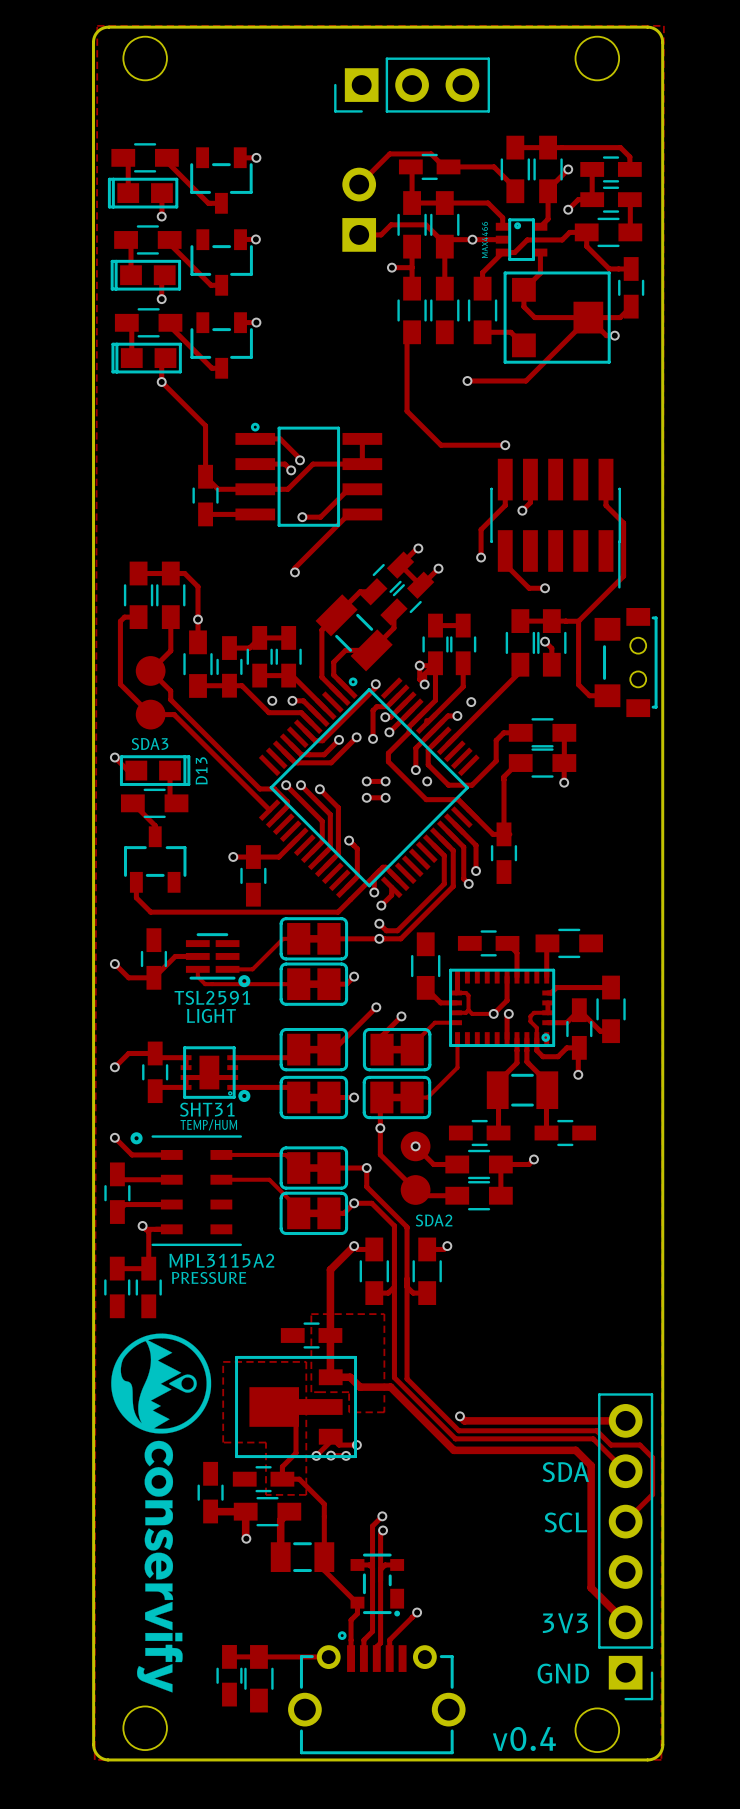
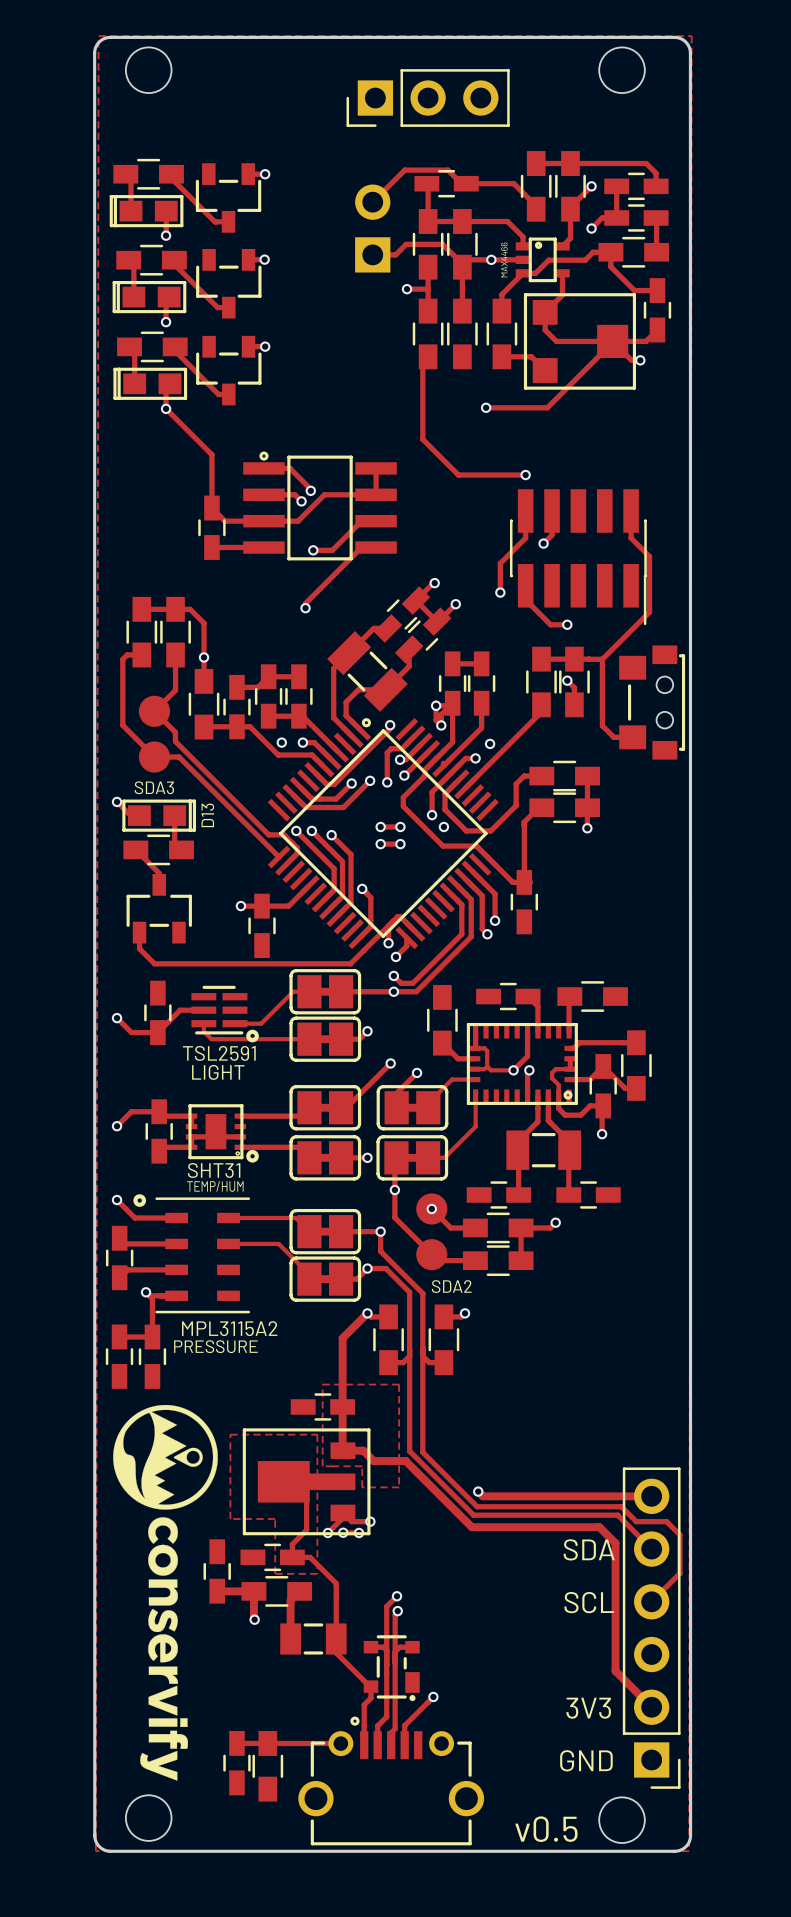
text: v0.4 (524, 1738) -> v0.5 (546, 1829)

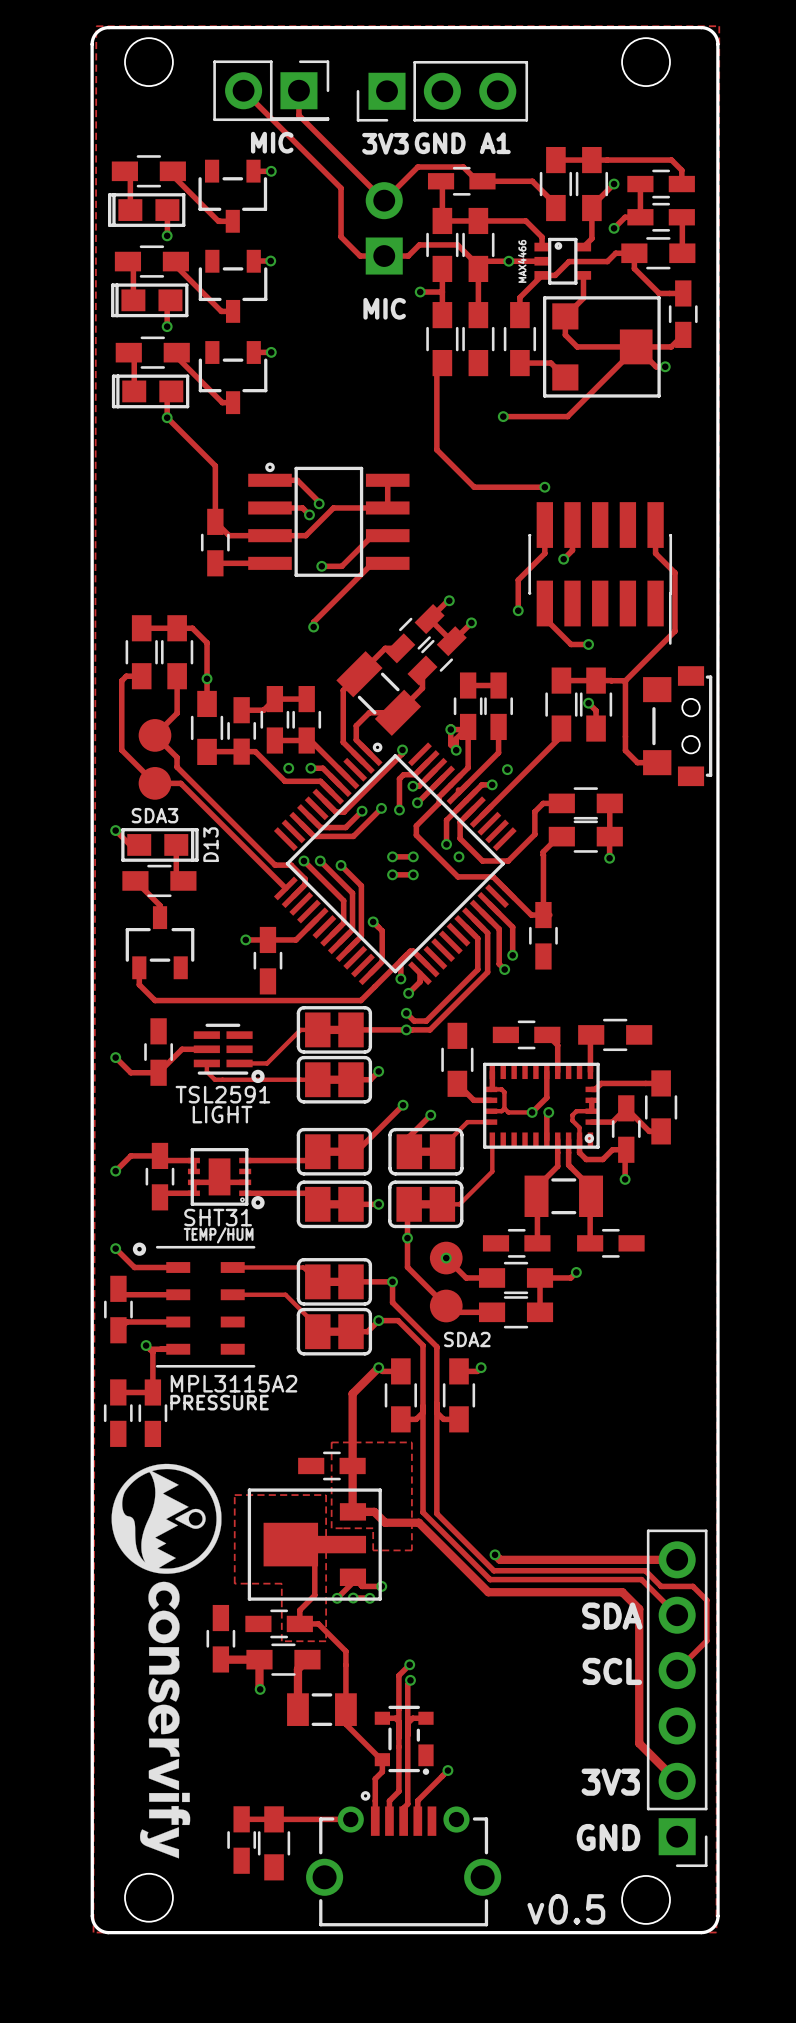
track: none -> (243, 90) (341, 188) (341, 236) (360, 256) (384, 256)
part: none -> (271, 90)
track: none -> (298, 90) (298, 115) (384, 200)
text: none -> MIC (272, 142)
text: none -> GND (440, 143)
text: none -> A1 (495, 143)
text: none -> 3V3 (385, 143)
text: none -> MIC (384, 308)

